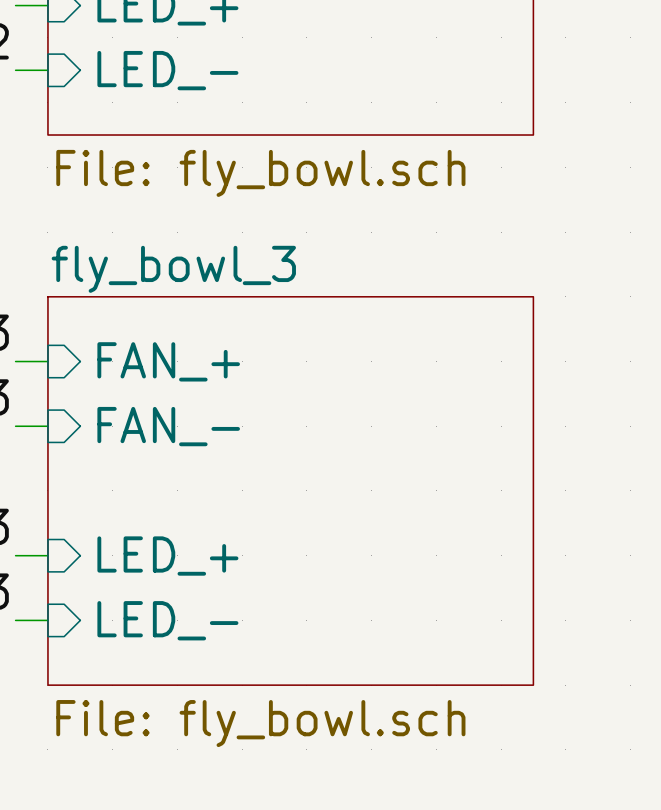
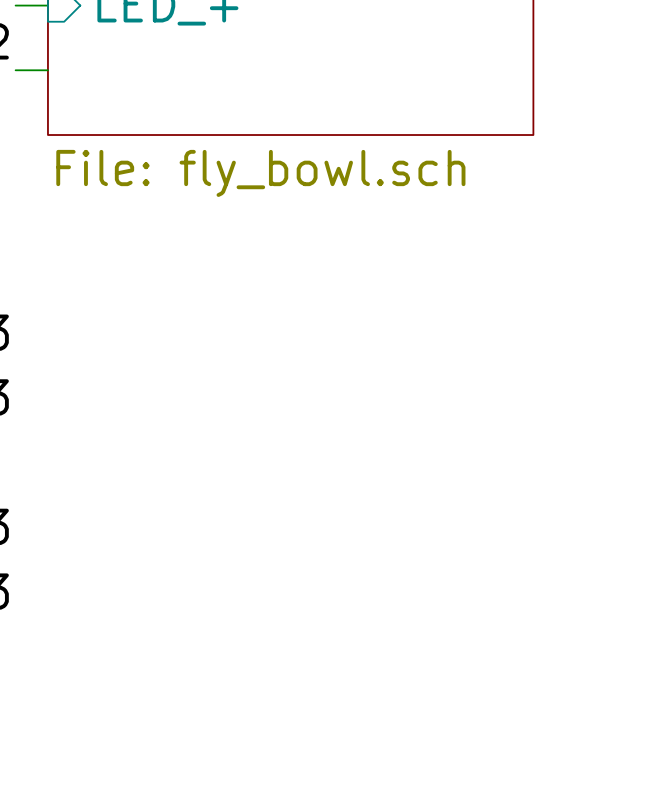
sheet pin: LED_- (167, 70) -> none
wire: (15, 361) (47, 361) -> none
sheet pin: FAN_+ (168, 361) -> none
wire: (15, 426) (47, 426) -> none
sheet pin: FAN_- (168, 426) -> none
sheet fly_bowl_3: File: fly_bowl.sch (290, 490) -> none
wire: (15, 555) (47, 555) -> none
sheet pin: LED_+ (167, 556) -> none
wire: (15, 620) (47, 620) -> none
sheet pin: LED_- (167, 620) -> none

